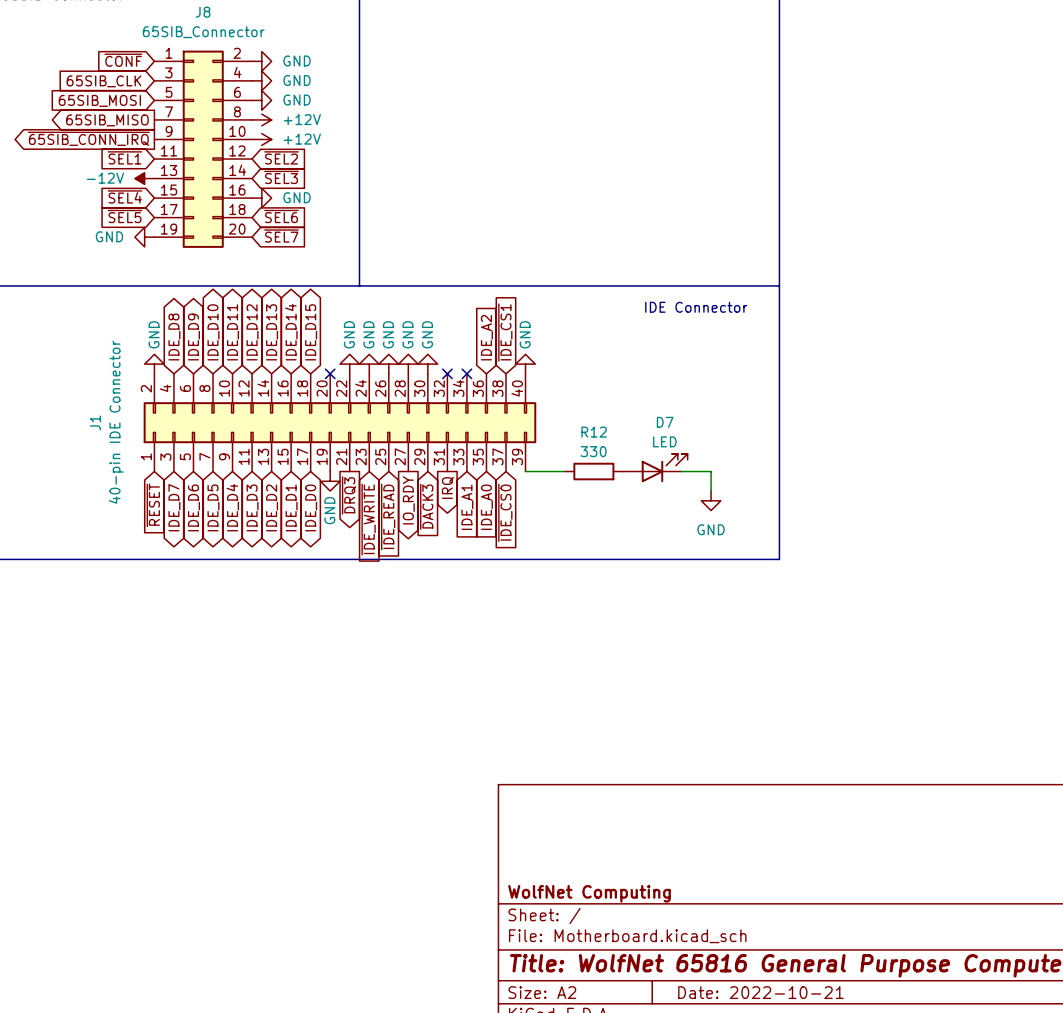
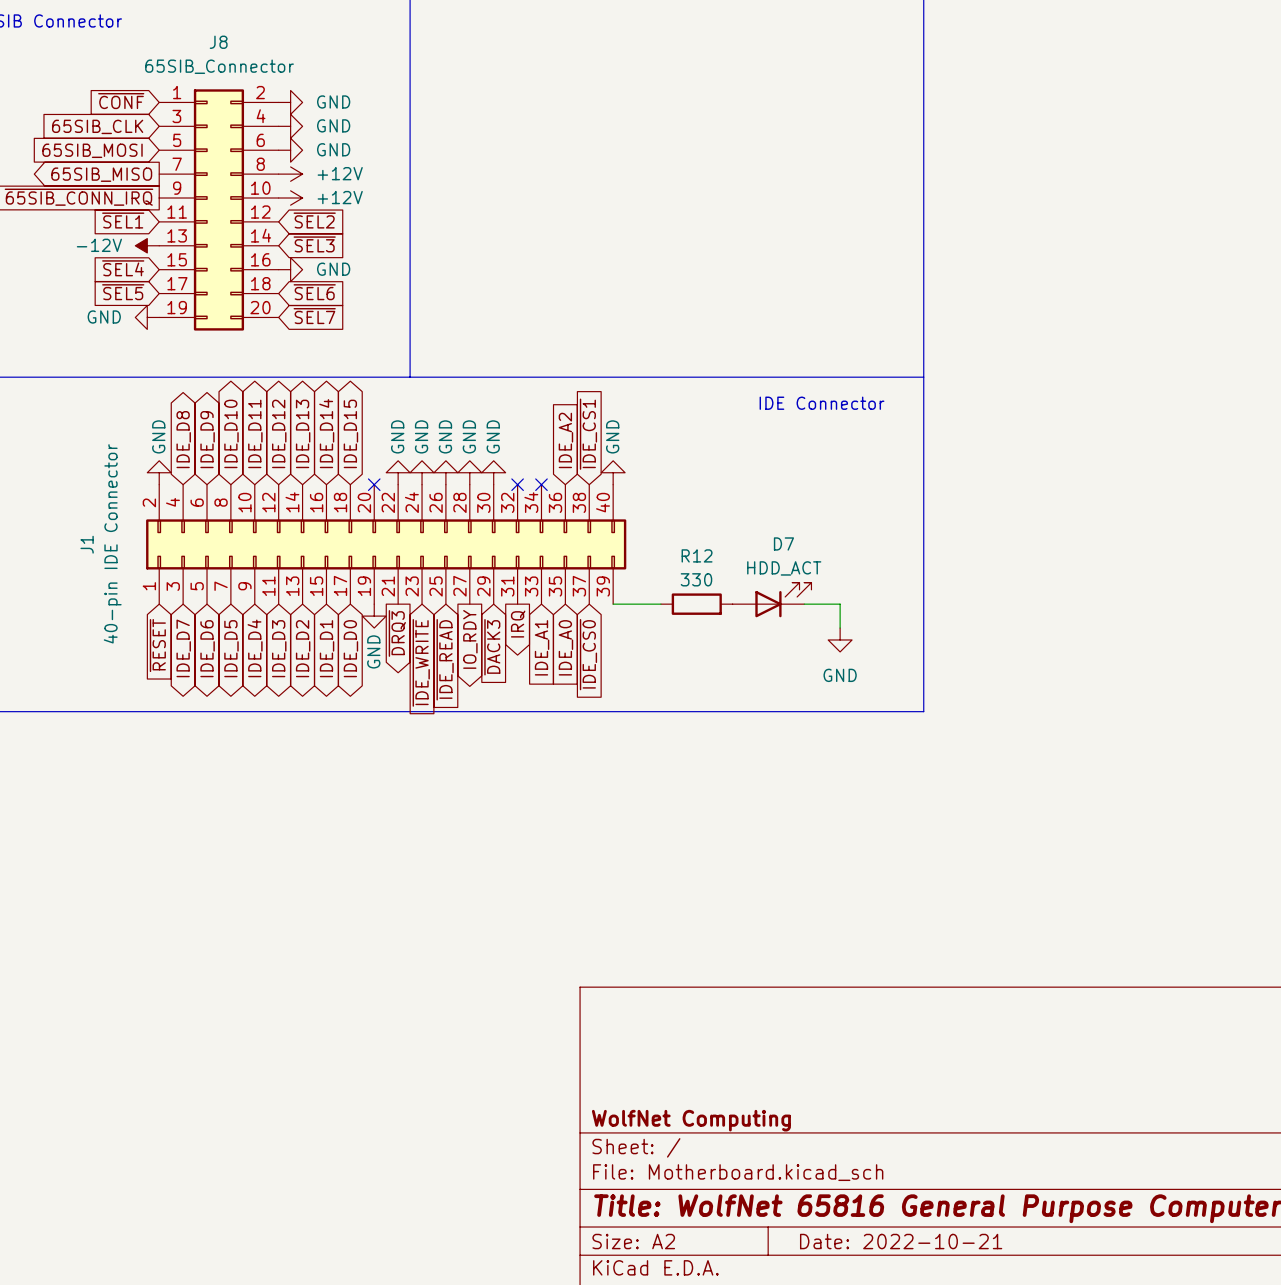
D7 value: LED (664, 441) -> HDD_ACT (784, 568)

